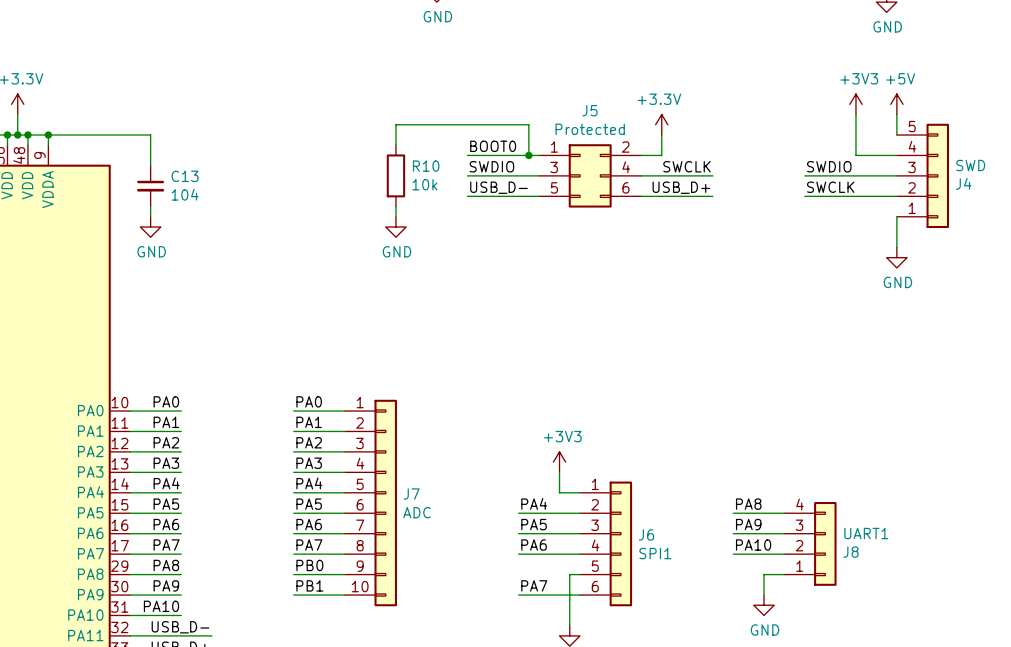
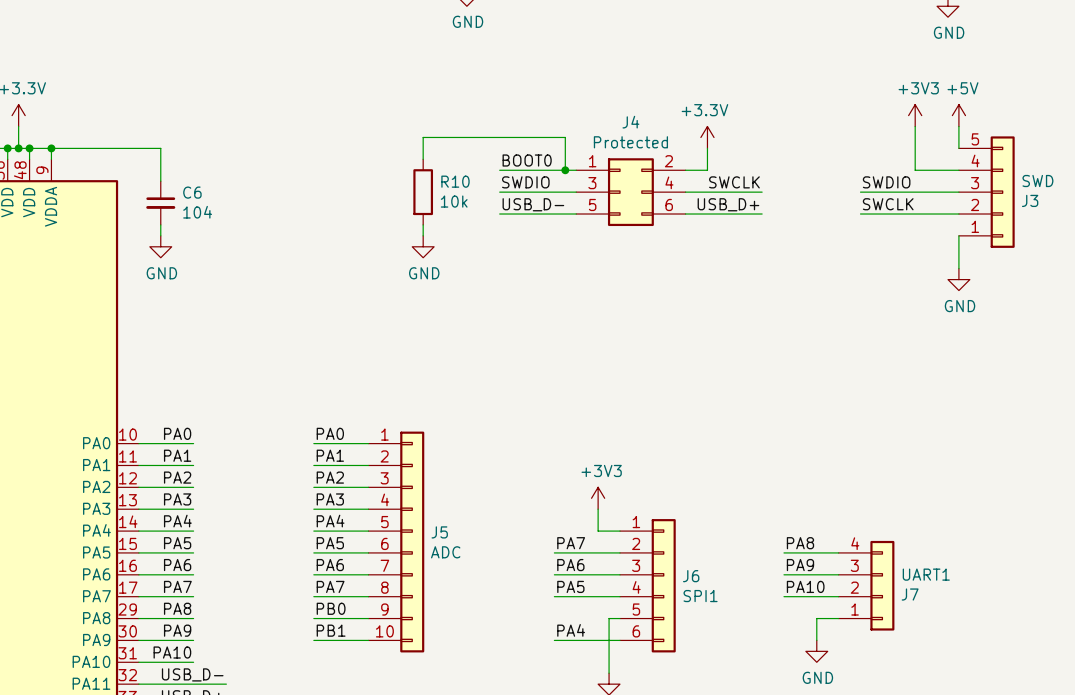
J5 name: J5 (589, 110) -> J4 (630, 122)
C13 name: C13 (185, 176) -> C6 (192, 192)
J4 name: J4 (963, 183) -> J3 (1030, 200)
J7 name: J7 (411, 494) -> J5 (439, 532)
label: PA4 (534, 503) -> PA7 (571, 543)
label: PA5 (534, 524) -> PA6 (570, 565)
label: PA6 (534, 545) -> PA5 (570, 586)
J8 name: J8 (850, 552) -> J7 (910, 594)
label: PA7 (534, 585) -> PA4 (571, 630)

